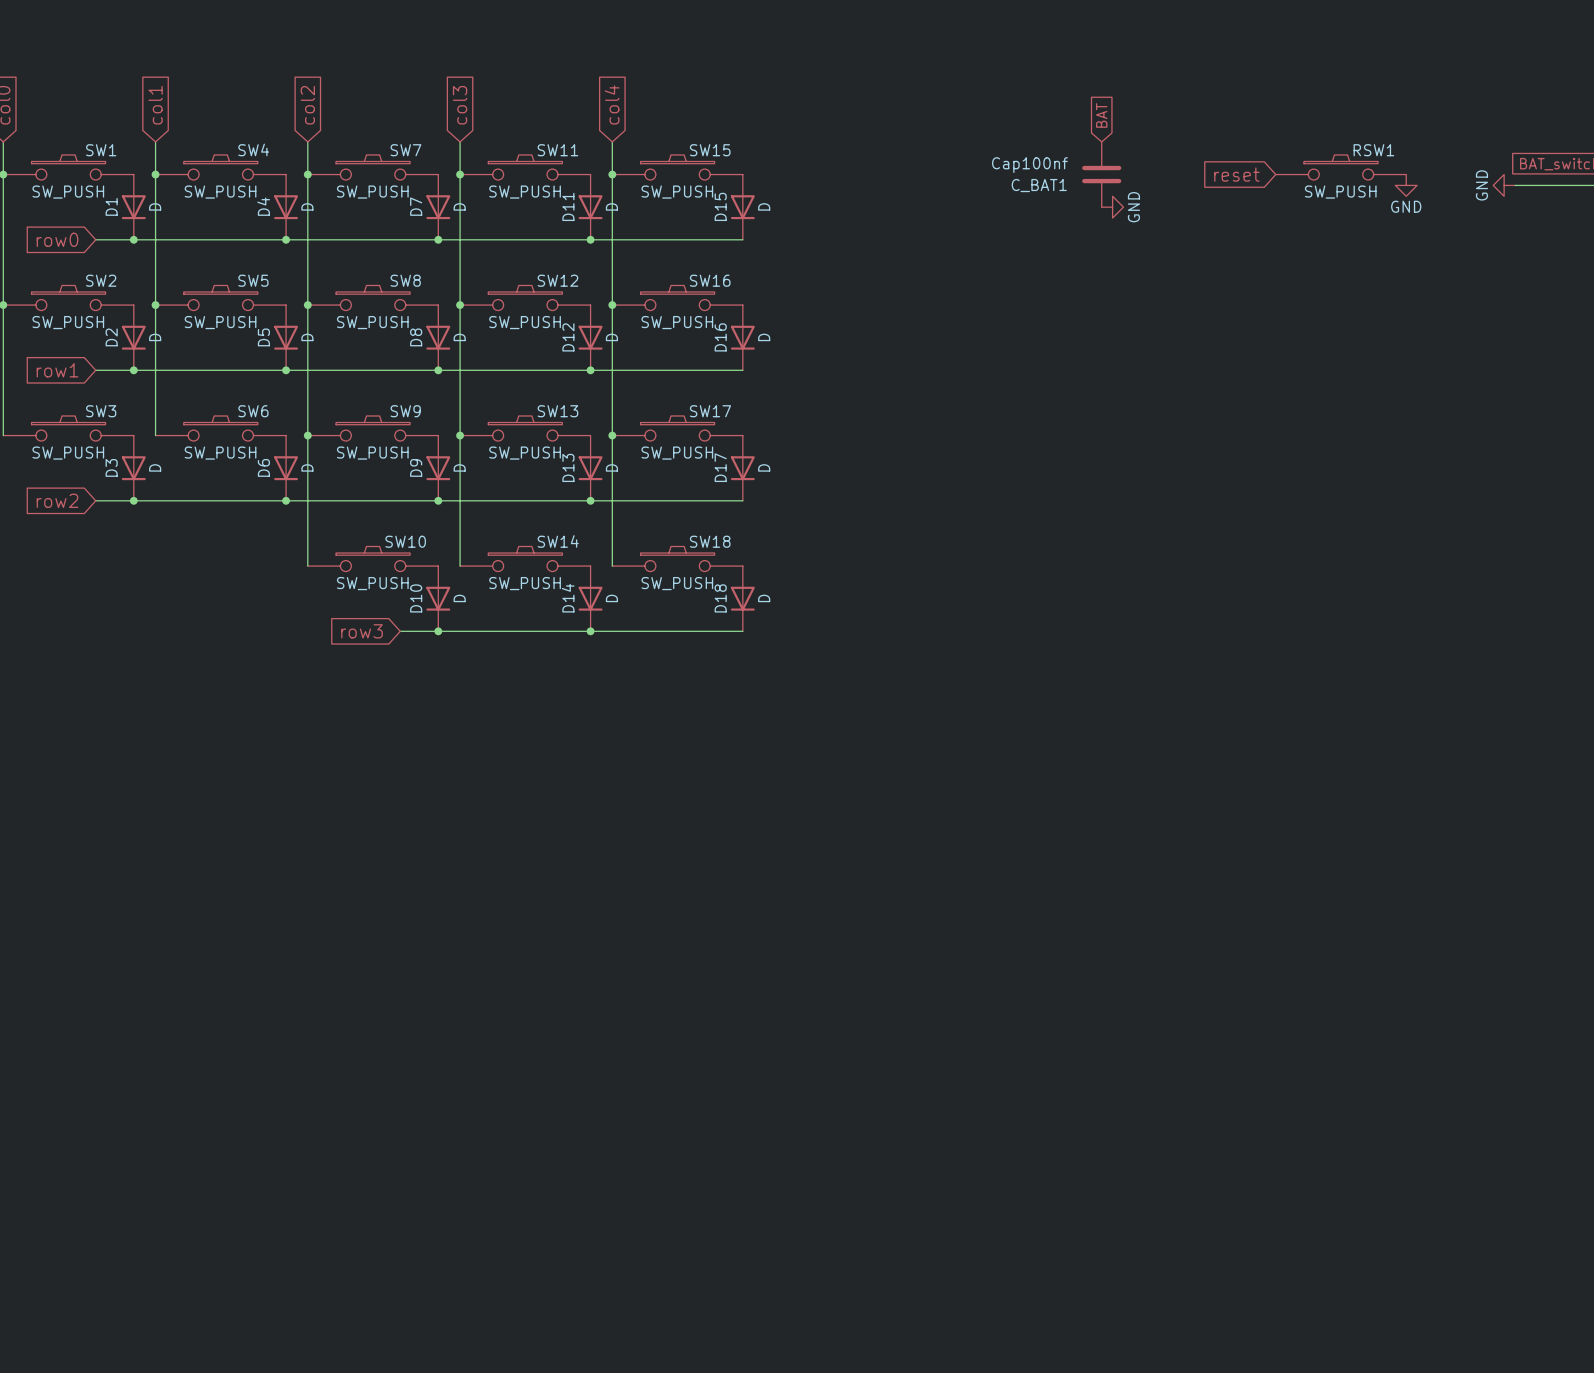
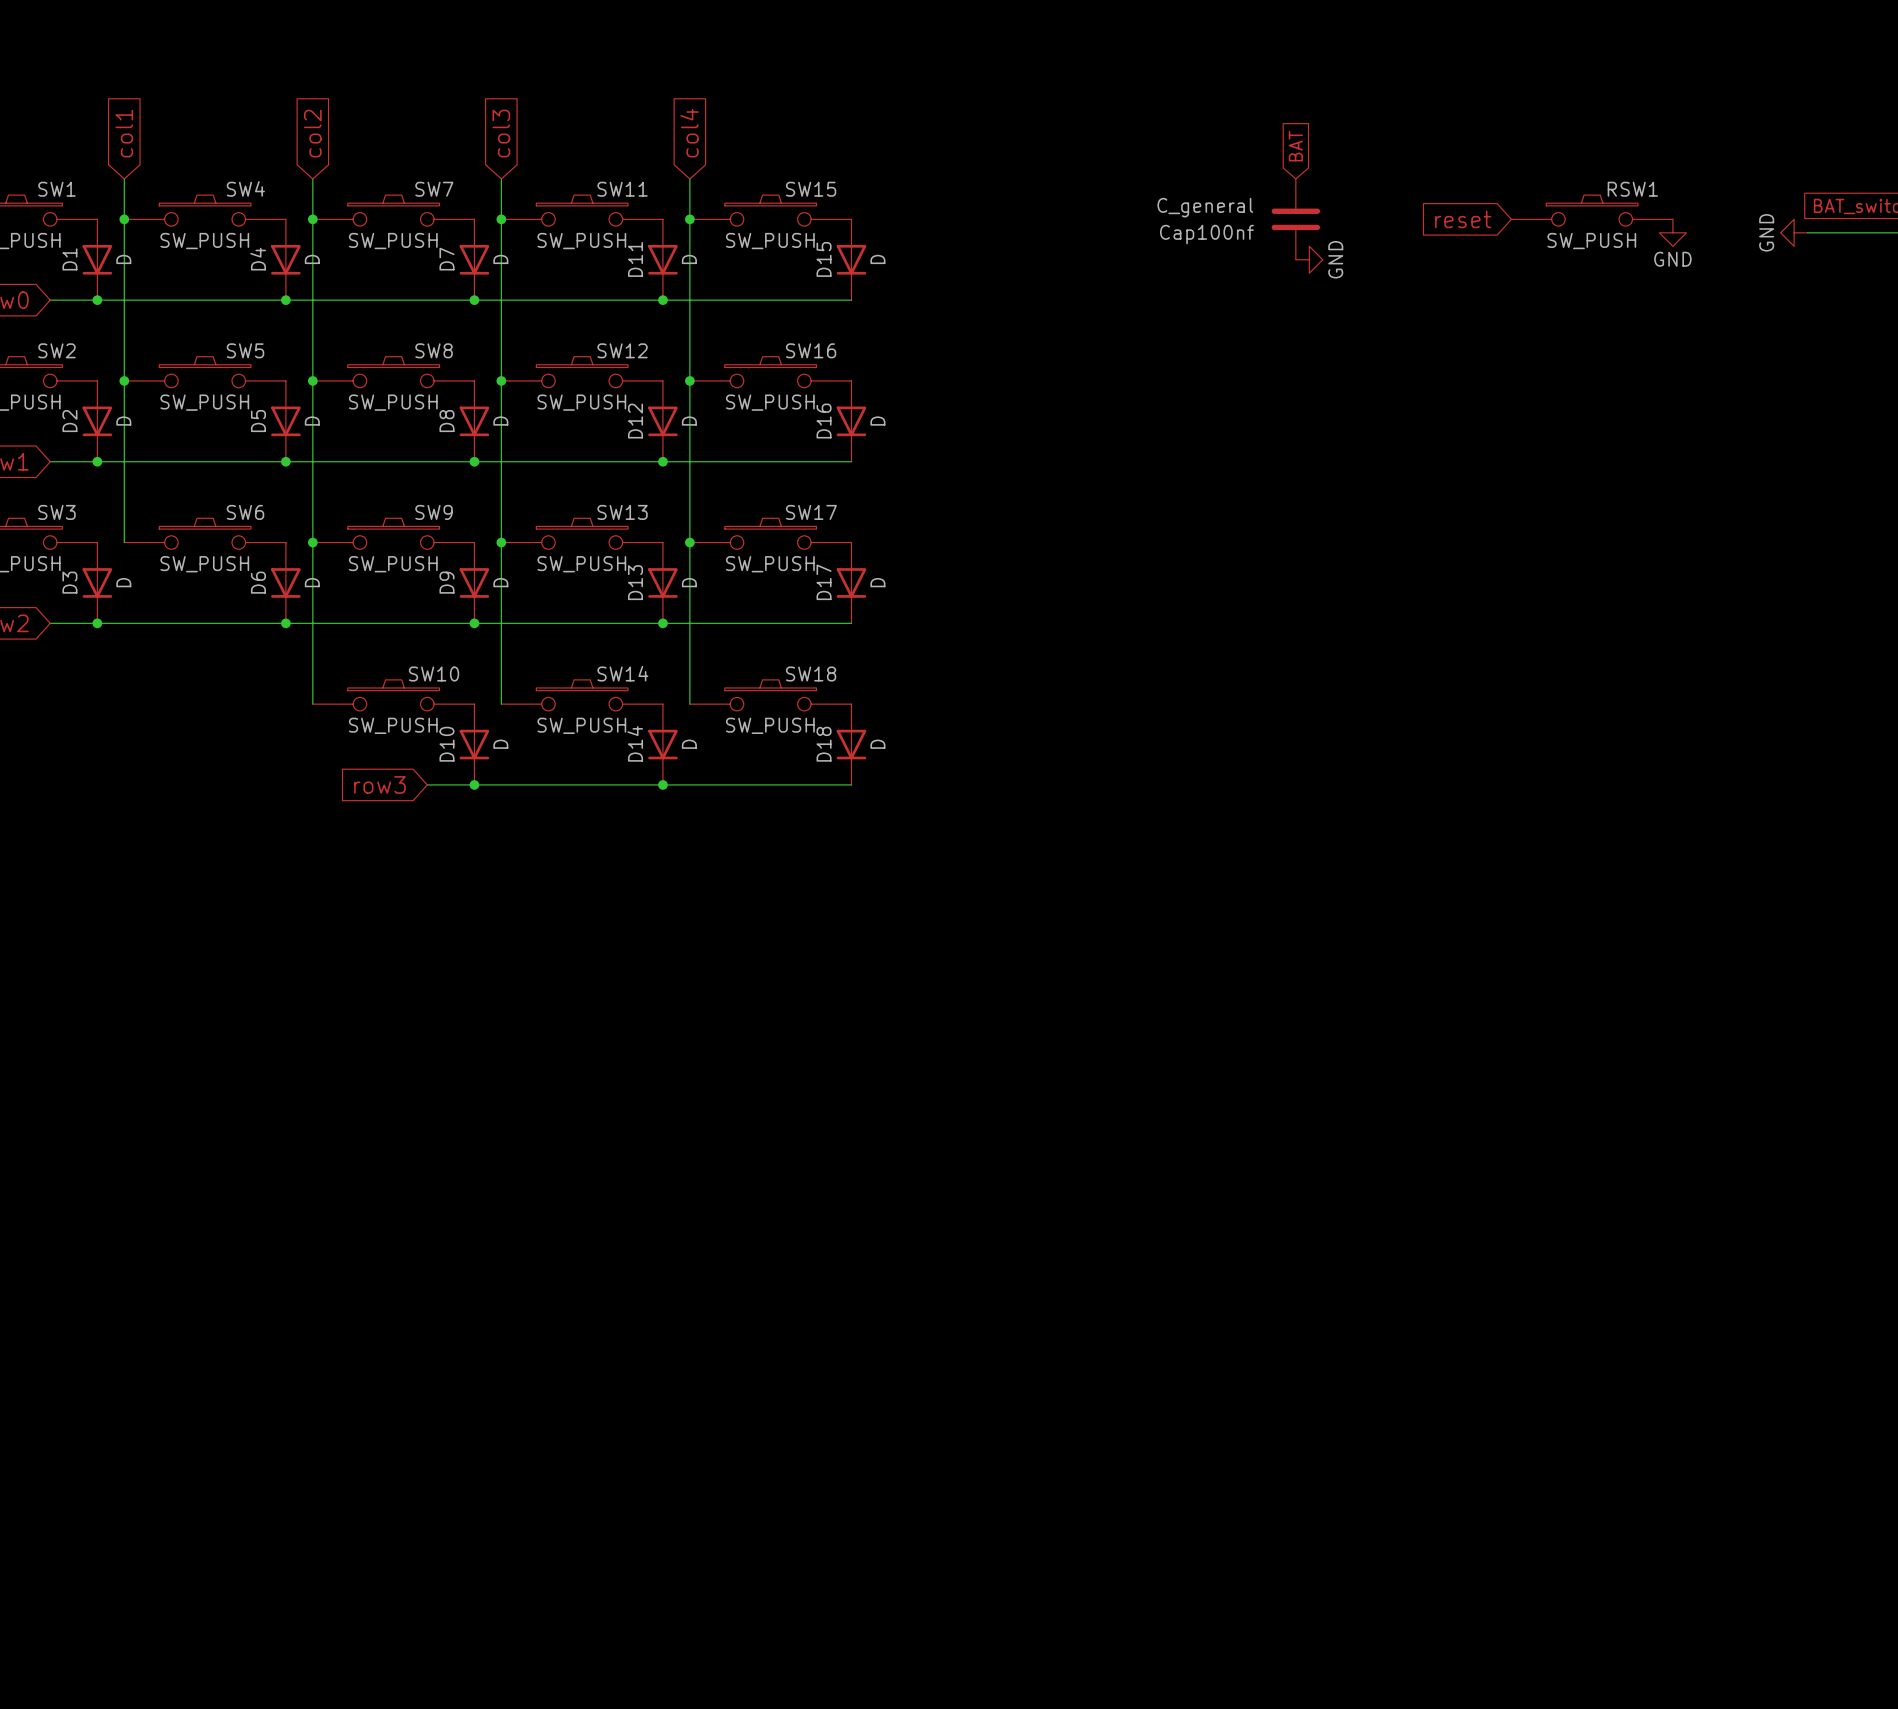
C_BAT1 value: Cap100nf (1029, 165) -> C_general (1205, 207)
C_BAT1 name: C_BAT1 (1039, 185) -> Cap100nf (1206, 234)

